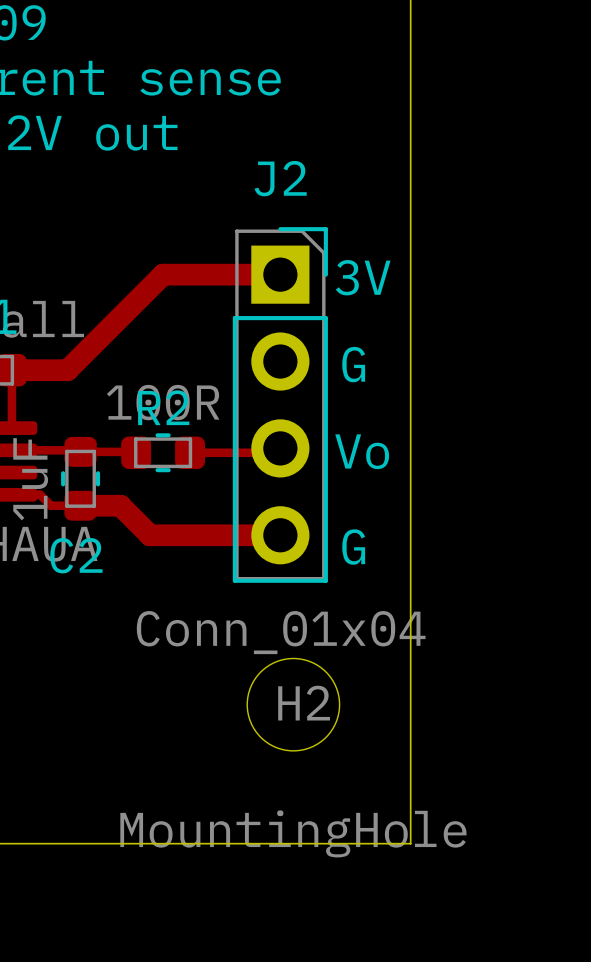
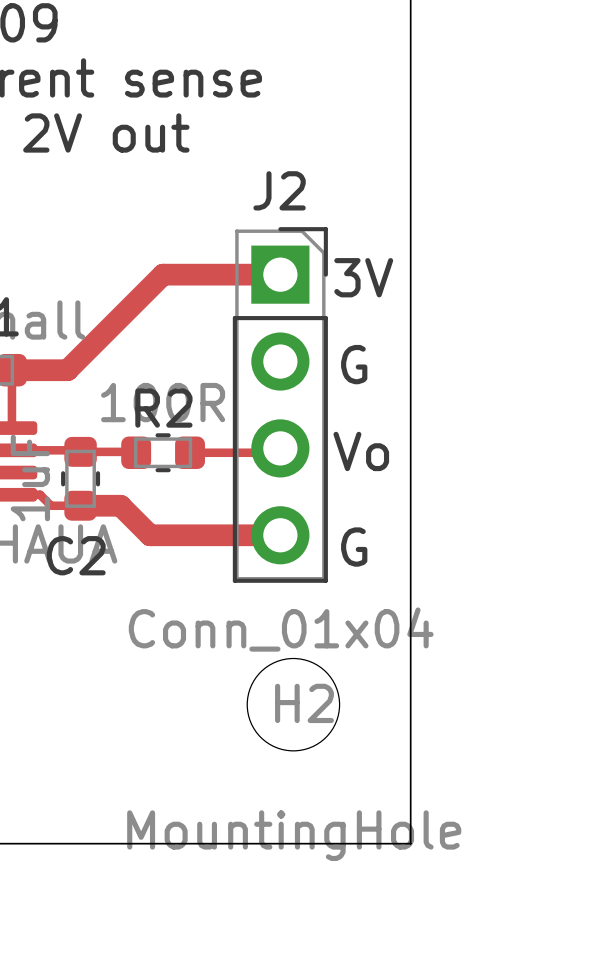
J2 name position: J2 (280, 178) -> J2 (279, 190)

